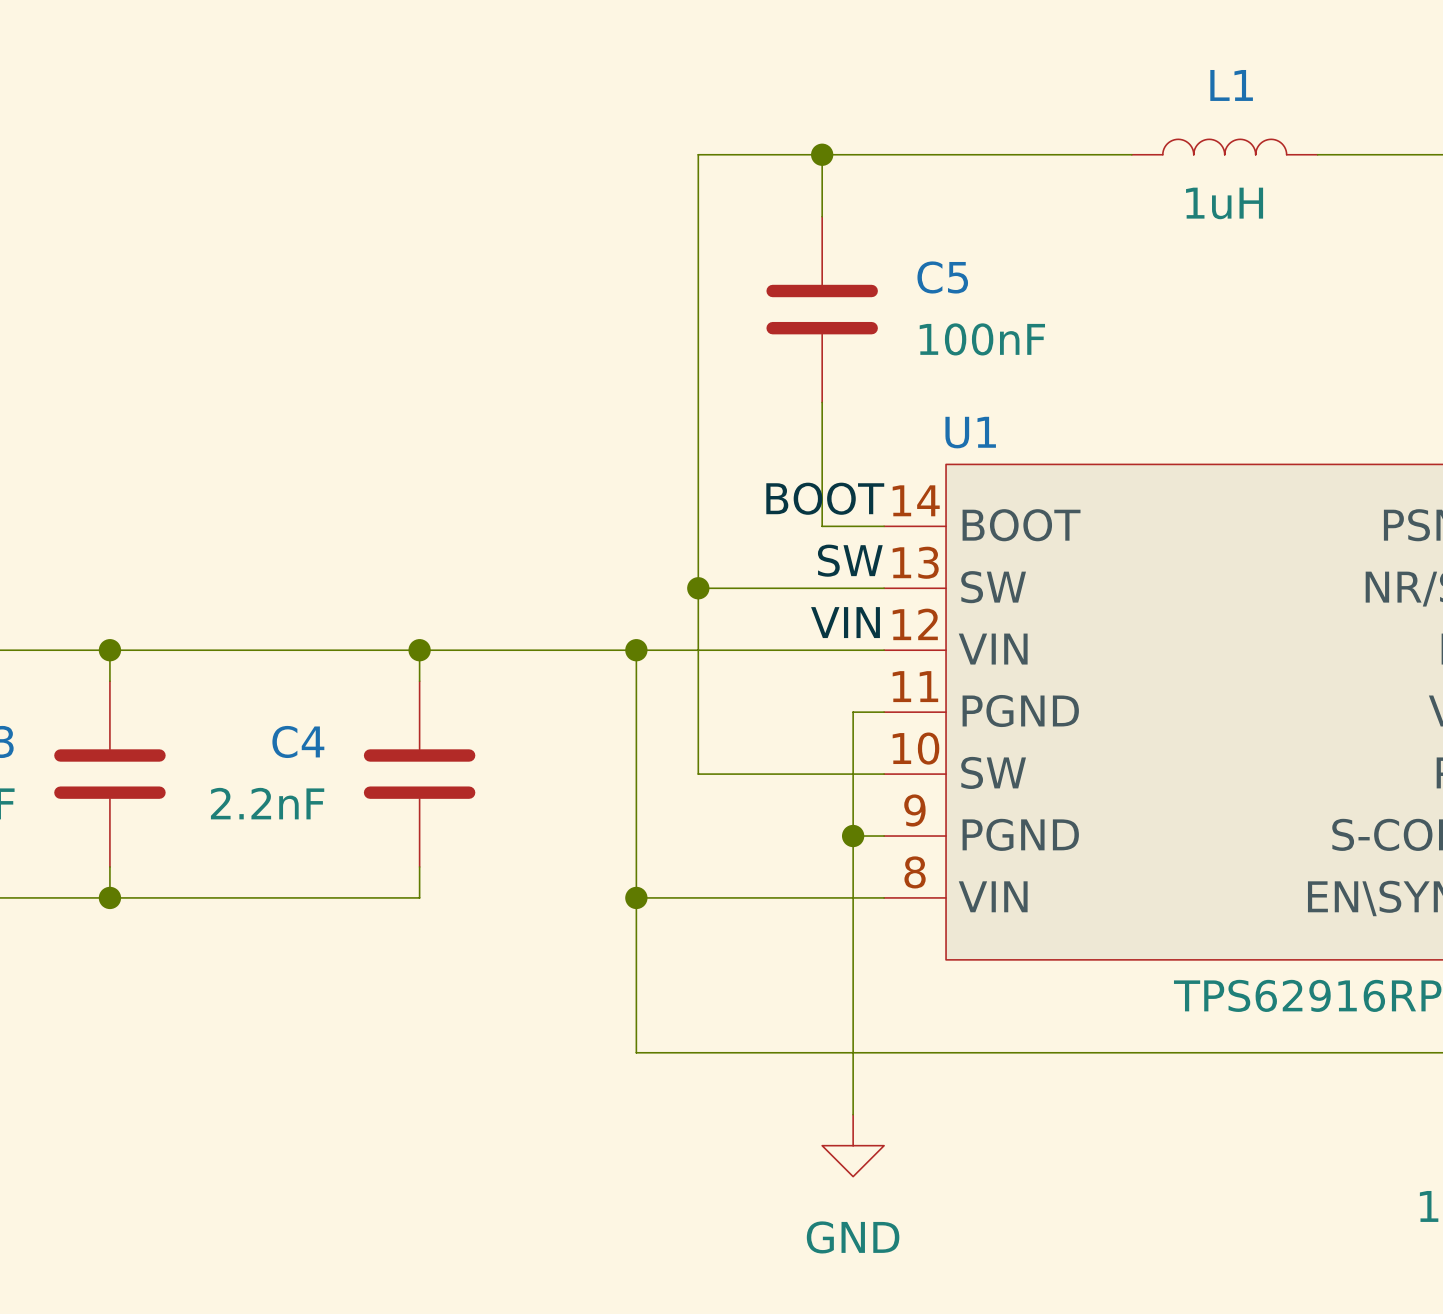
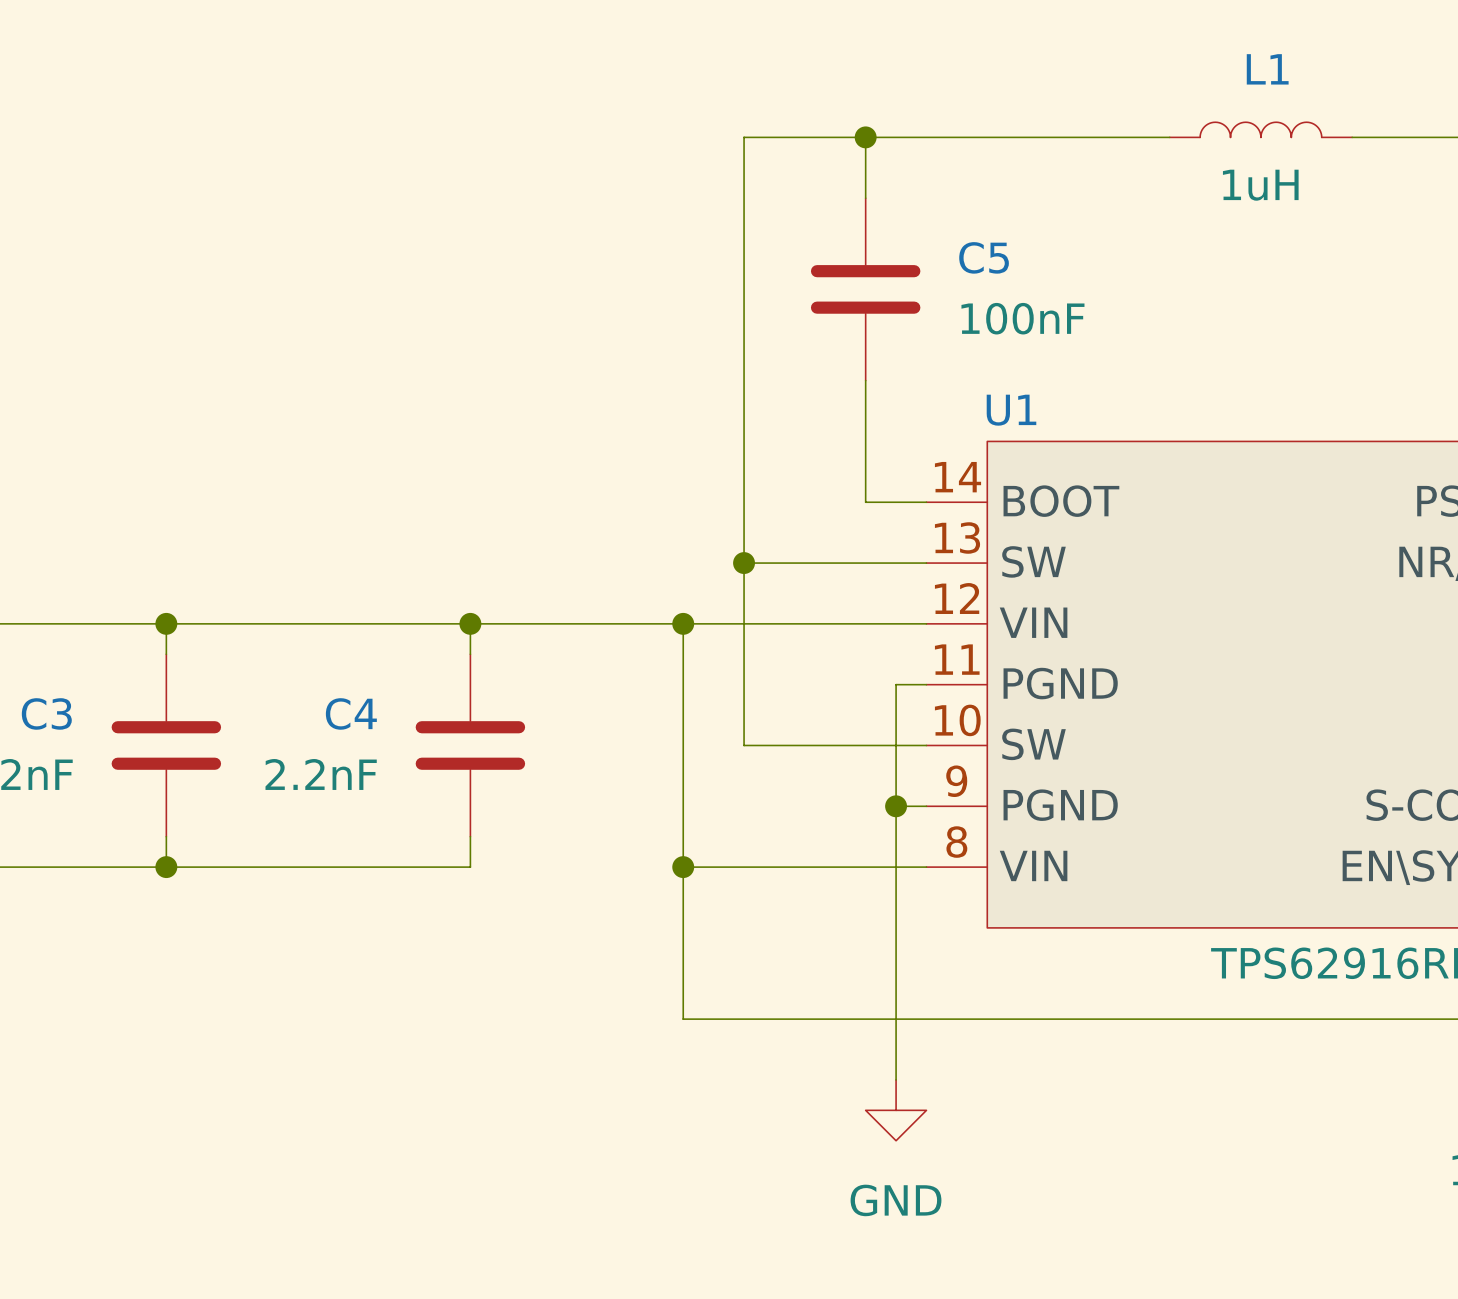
label: BOOT (825, 498) -> none
label: SW (850, 560) -> none
label: VIN (845, 622) -> none

